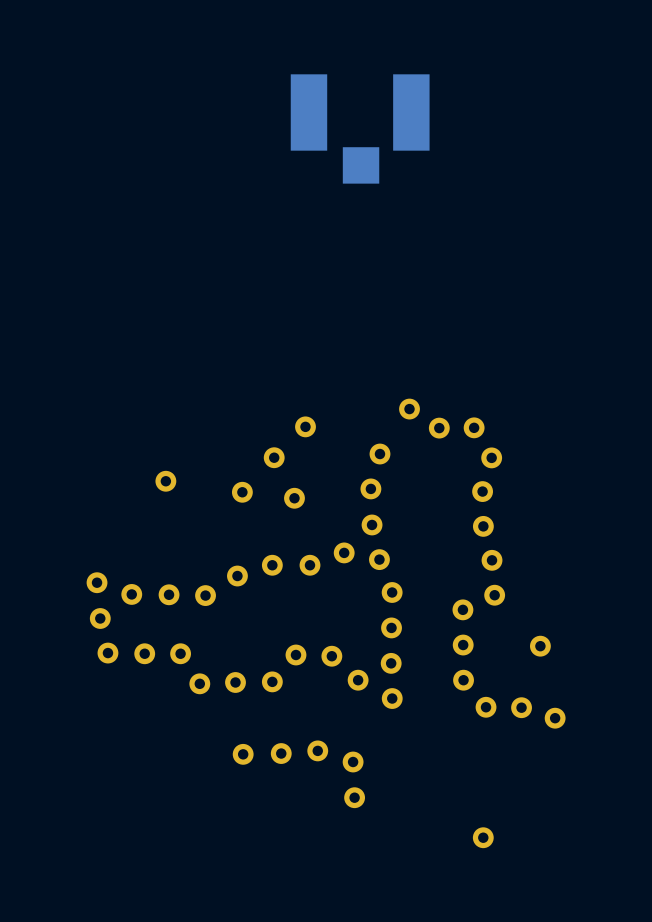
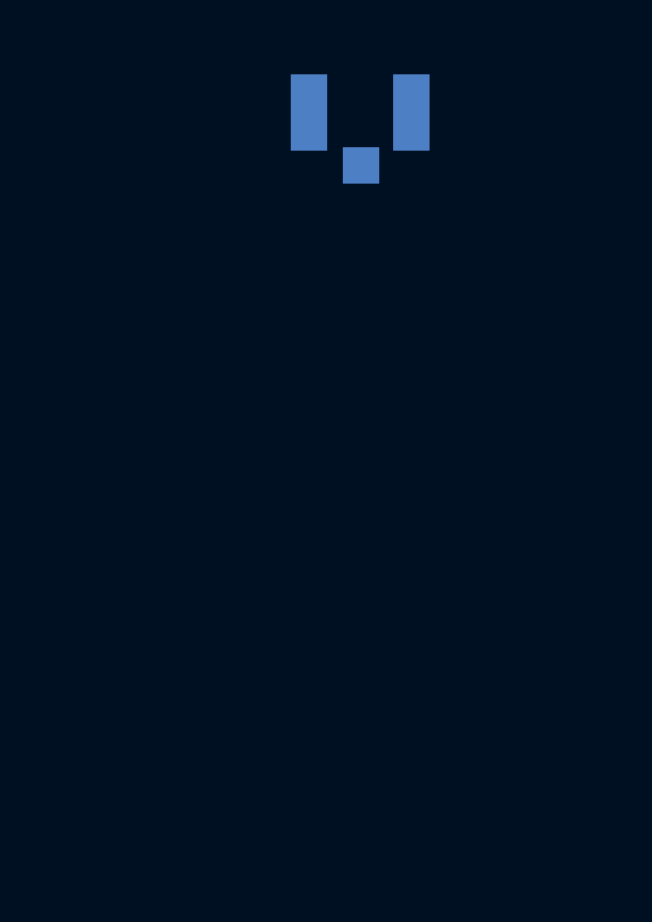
part: (409, 409) -> none
part: (305, 426) -> none
part: (474, 427) -> none
part: (439, 428) -> none
part: (379, 454) -> none
part: (274, 457) -> none
part: (491, 457) -> none
part: (165, 481) -> none
part: (370, 488) -> none
part: (482, 491) -> none
part: (242, 492) -> none
part: (294, 498) -> none
part: (372, 524) -> none
part: (483, 526) -> none
part: (344, 552) -> none
part: (379, 559) -> none
part: (492, 560) -> none
part: (272, 565) -> none
part: (309, 565) -> none
part: (237, 576) -> none
part: (97, 582) -> none
part: (392, 592) -> none
part: (131, 594) -> none
part: (169, 594) -> none
part: (205, 595) -> none
part: (494, 595) -> none
part: (462, 609) -> none
part: (100, 618) -> none
part: (391, 627) -> none
part: (463, 645) -> none
part: (540, 646) -> none
part: (107, 653) -> none
part: (144, 653) -> none
part: (180, 653) -> none
part: (295, 654) -> none
part: (331, 656) -> none
part: (391, 663) -> none
part: (358, 680) -> none
part: (463, 680) -> none
part: (272, 681) -> none
part: (235, 682) -> none
part: (199, 683) -> none
part: (392, 698) -> none
part: (486, 707) -> none
part: (521, 707) -> none
part: (555, 718) -> none
part: (317, 750) -> none
part: (281, 753) -> none
part: (243, 754) -> none
part: (353, 762) -> none
part: (354, 797) -> none
part: (483, 837) -> none

